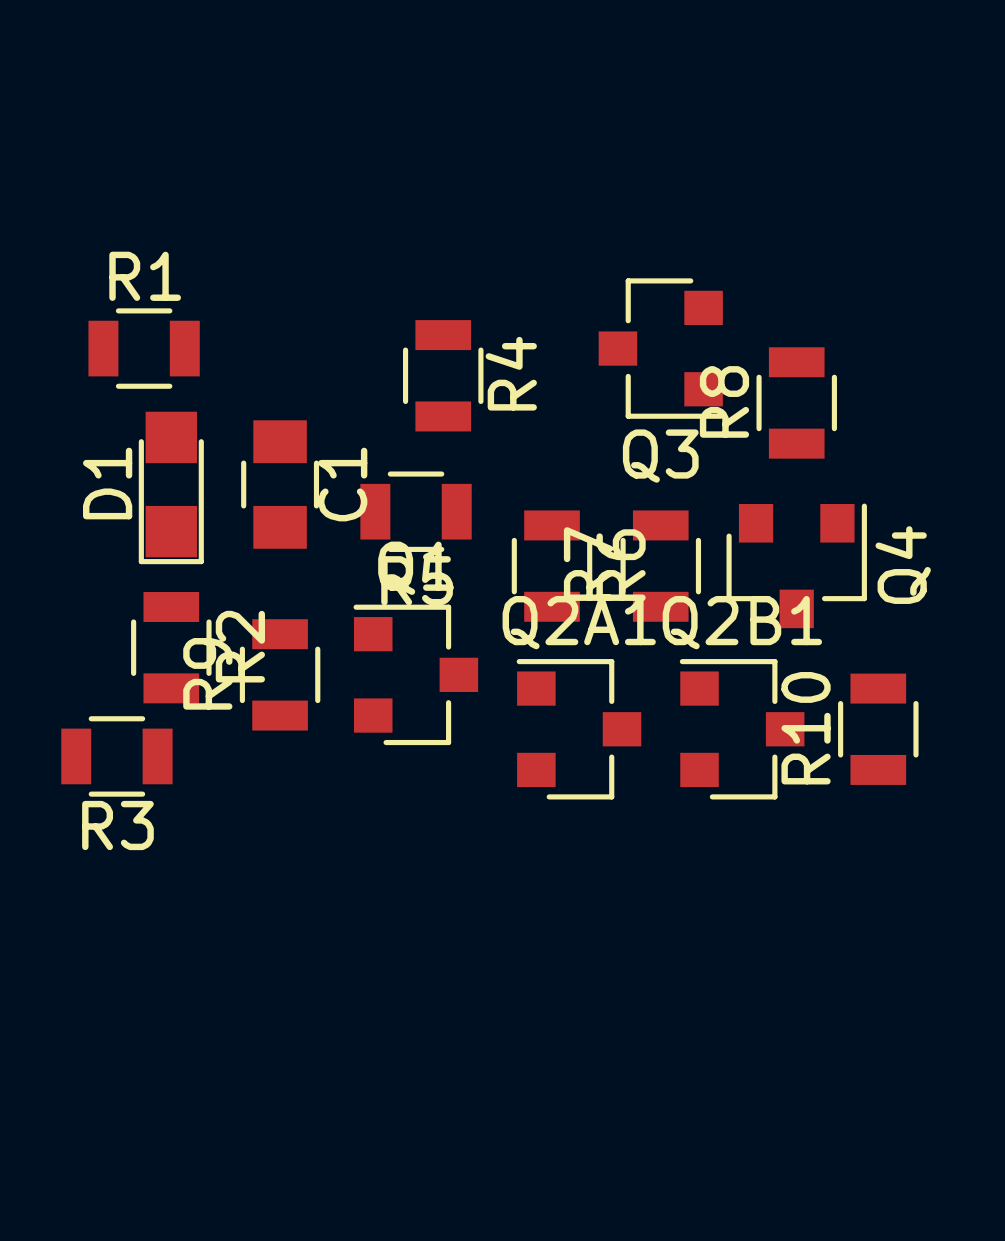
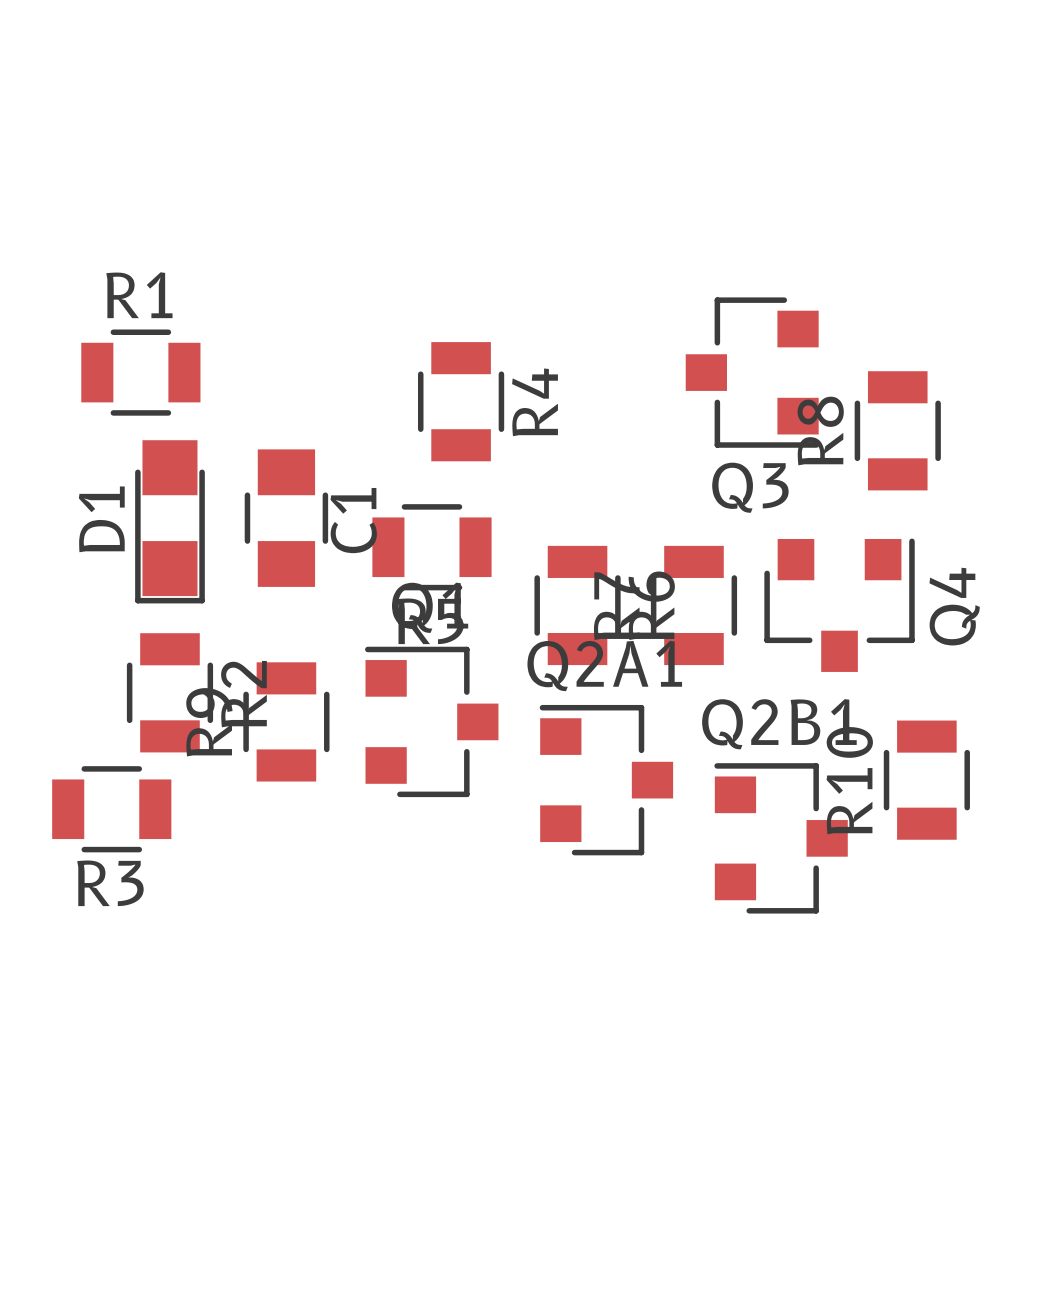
Q3 position: (660, 348) -> (752, 372)
R8 position: (796, 402) -> (897, 430)
Q2B1 position: (742, 729) -> (781, 838)

